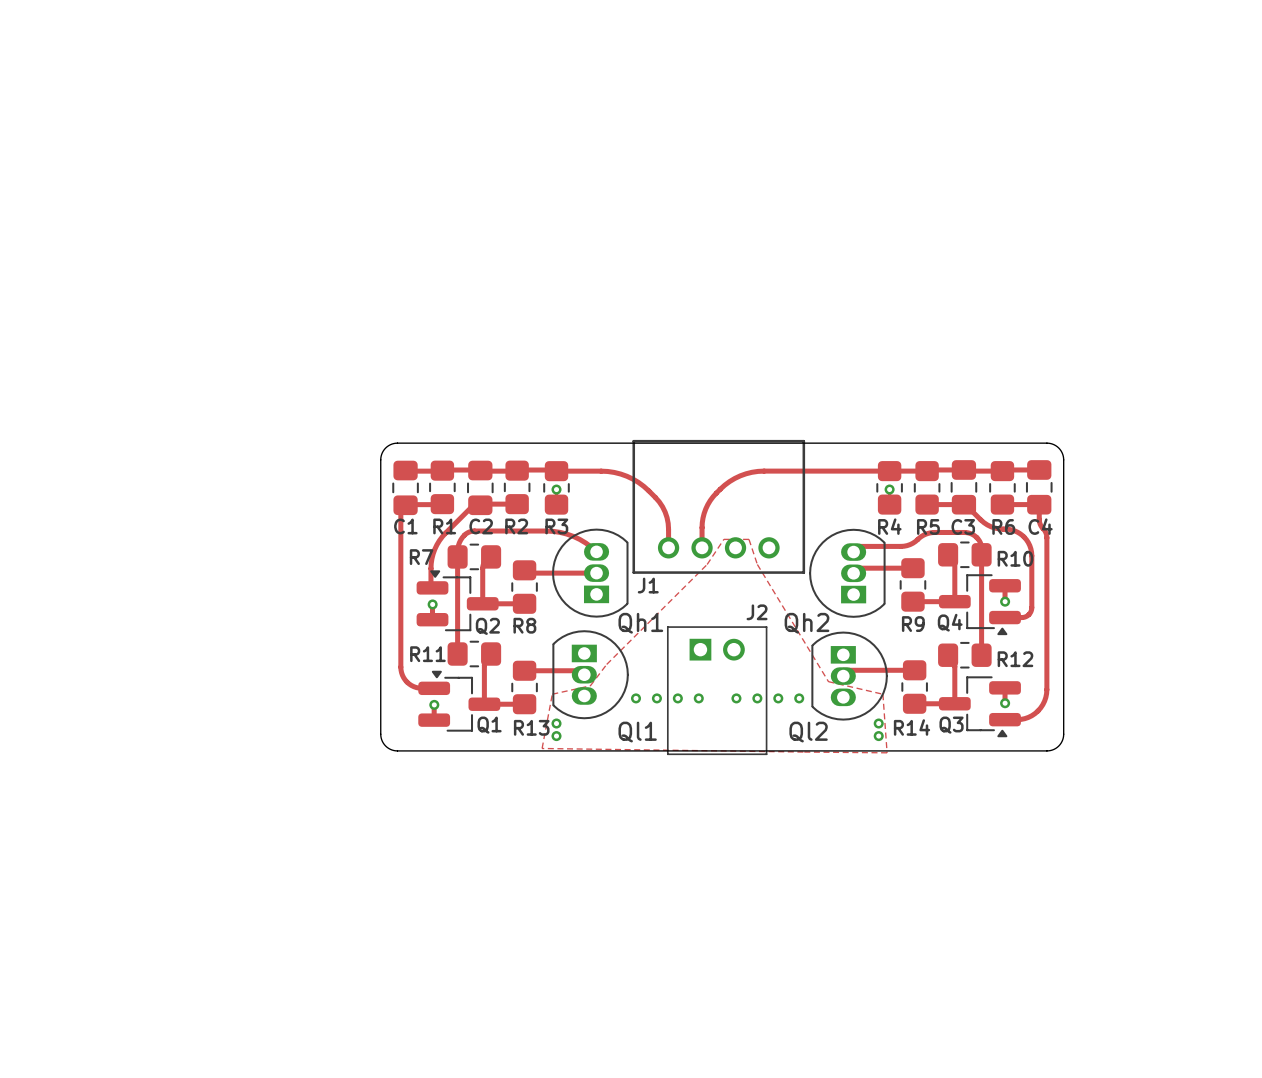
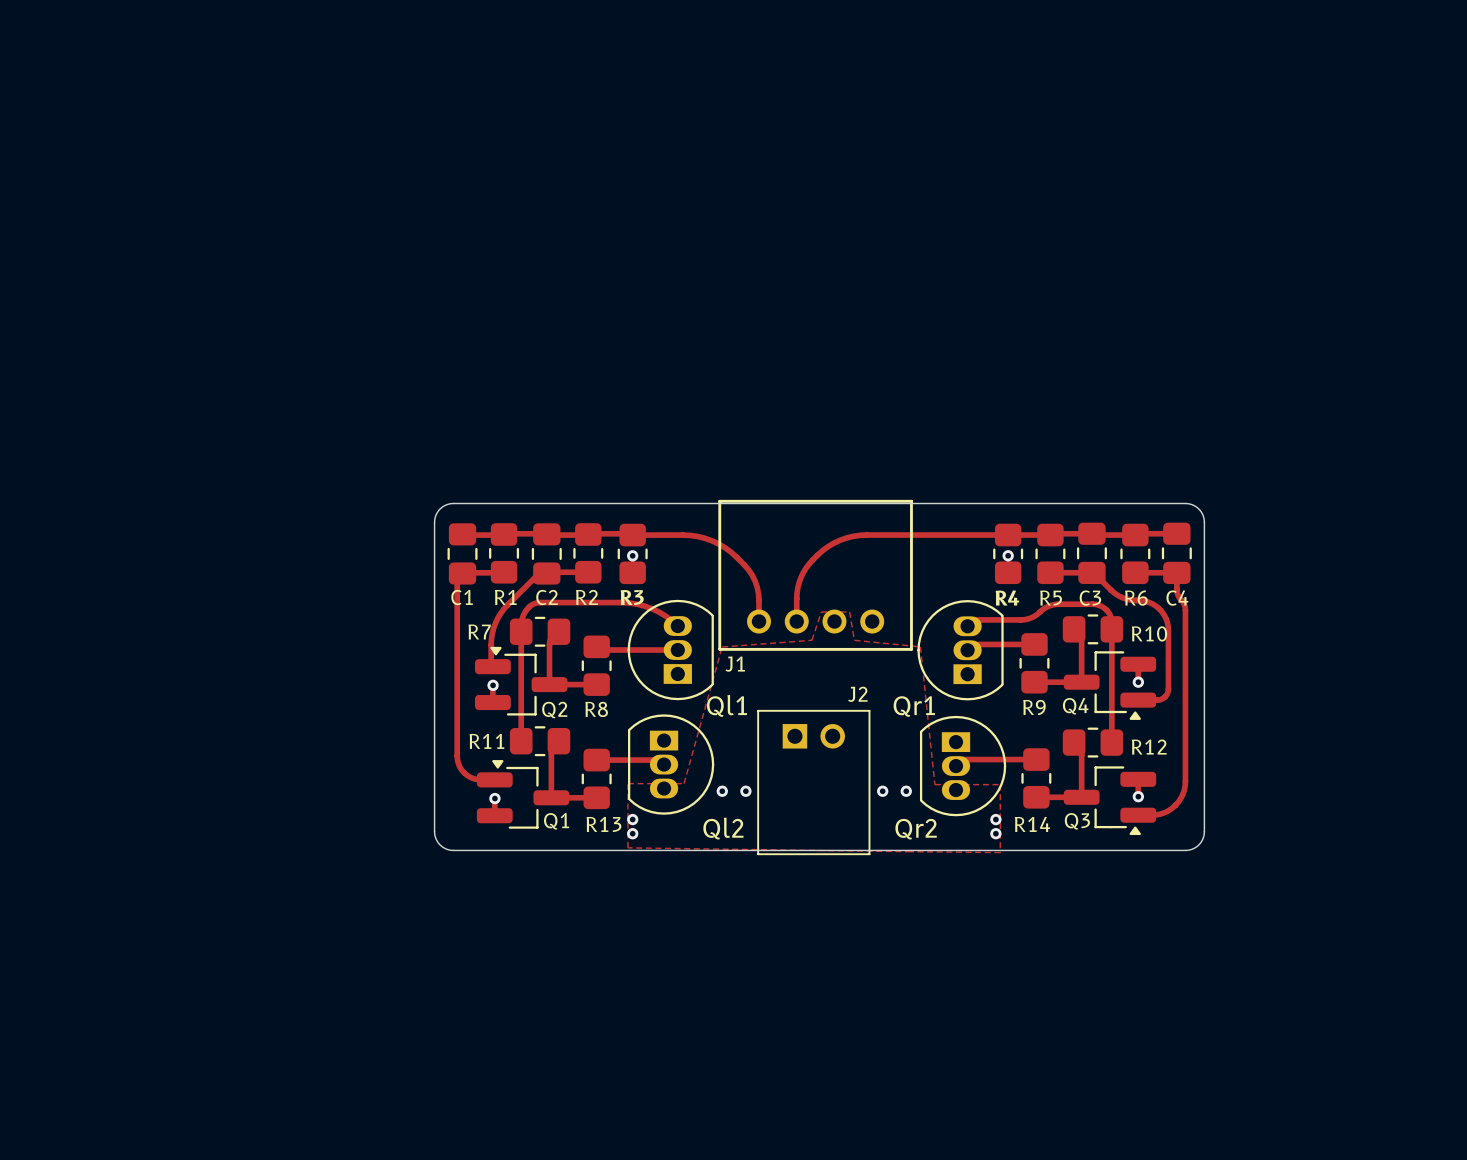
zone outline: (723, 539) (707, 564) (606, 664) (590, 685) (552, 694) (542, 748) (552, 748) -> (821, 612) (811, 640) (722, 646) (684, 783) (627, 783) (627, 847)
zone outline: (749, 539) (757, 564) (828, 681) (882, 694) (887, 752) (803, 752) -> (849, 612) (854, 640) (920, 646) (934, 784) (1000, 784) (1000, 852) (910, 851)
Qh1 name: Qh1 (640, 623) -> Ql1 (726, 705)
Qh2 name: Qh2 (806, 623) -> Qr1 (914, 706)
via: (677, 698) -> none
via: (698, 698) -> none
via: (736, 698) -> none
via: (757, 698) -> none
Ql1 name: Ql1 (637, 732) -> Ql2 (723, 828)
Ql2 name: Ql2 (808, 732) -> Qr2 (916, 829)

